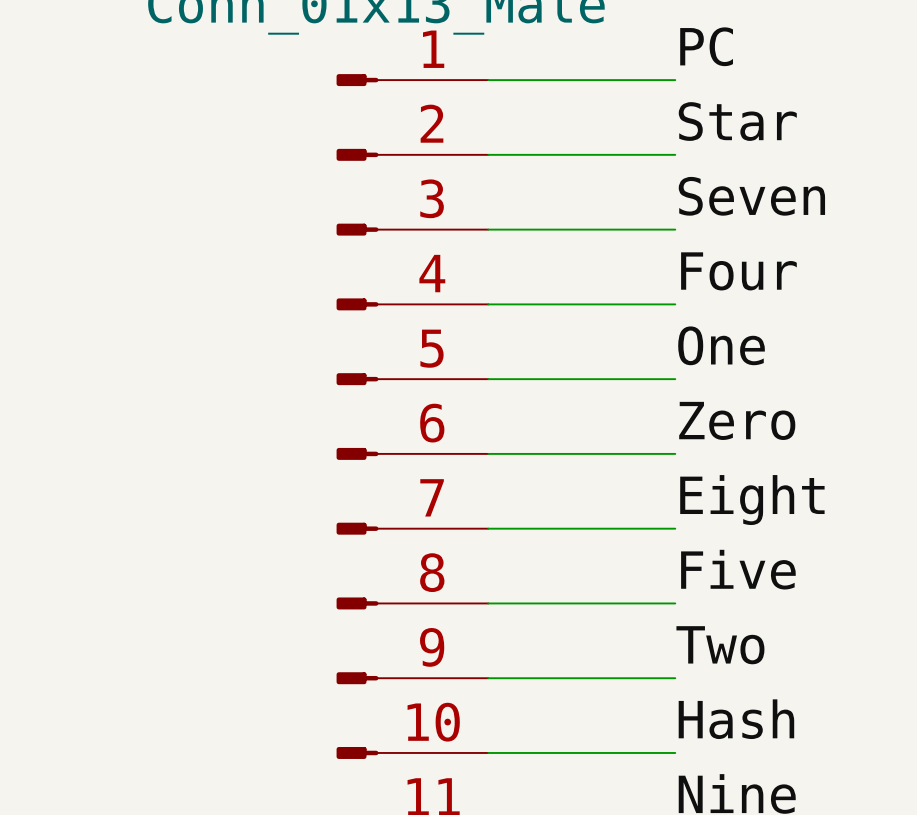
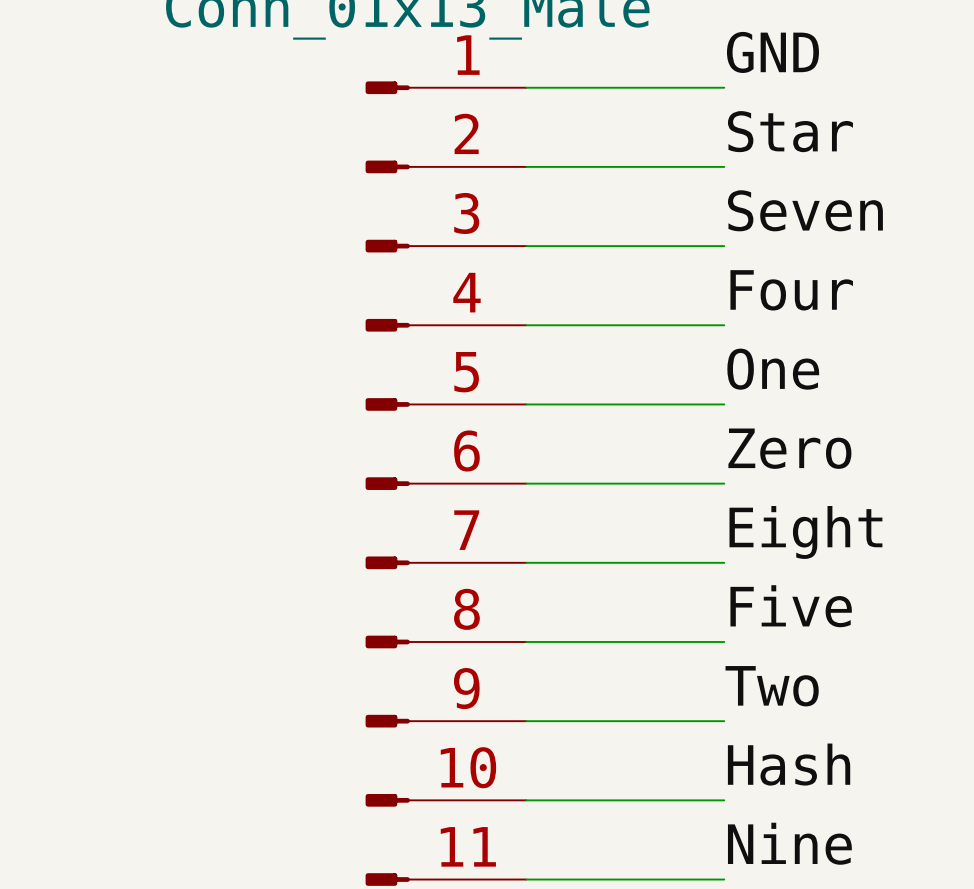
label: PC (706, 46) -> GND (772, 52)

